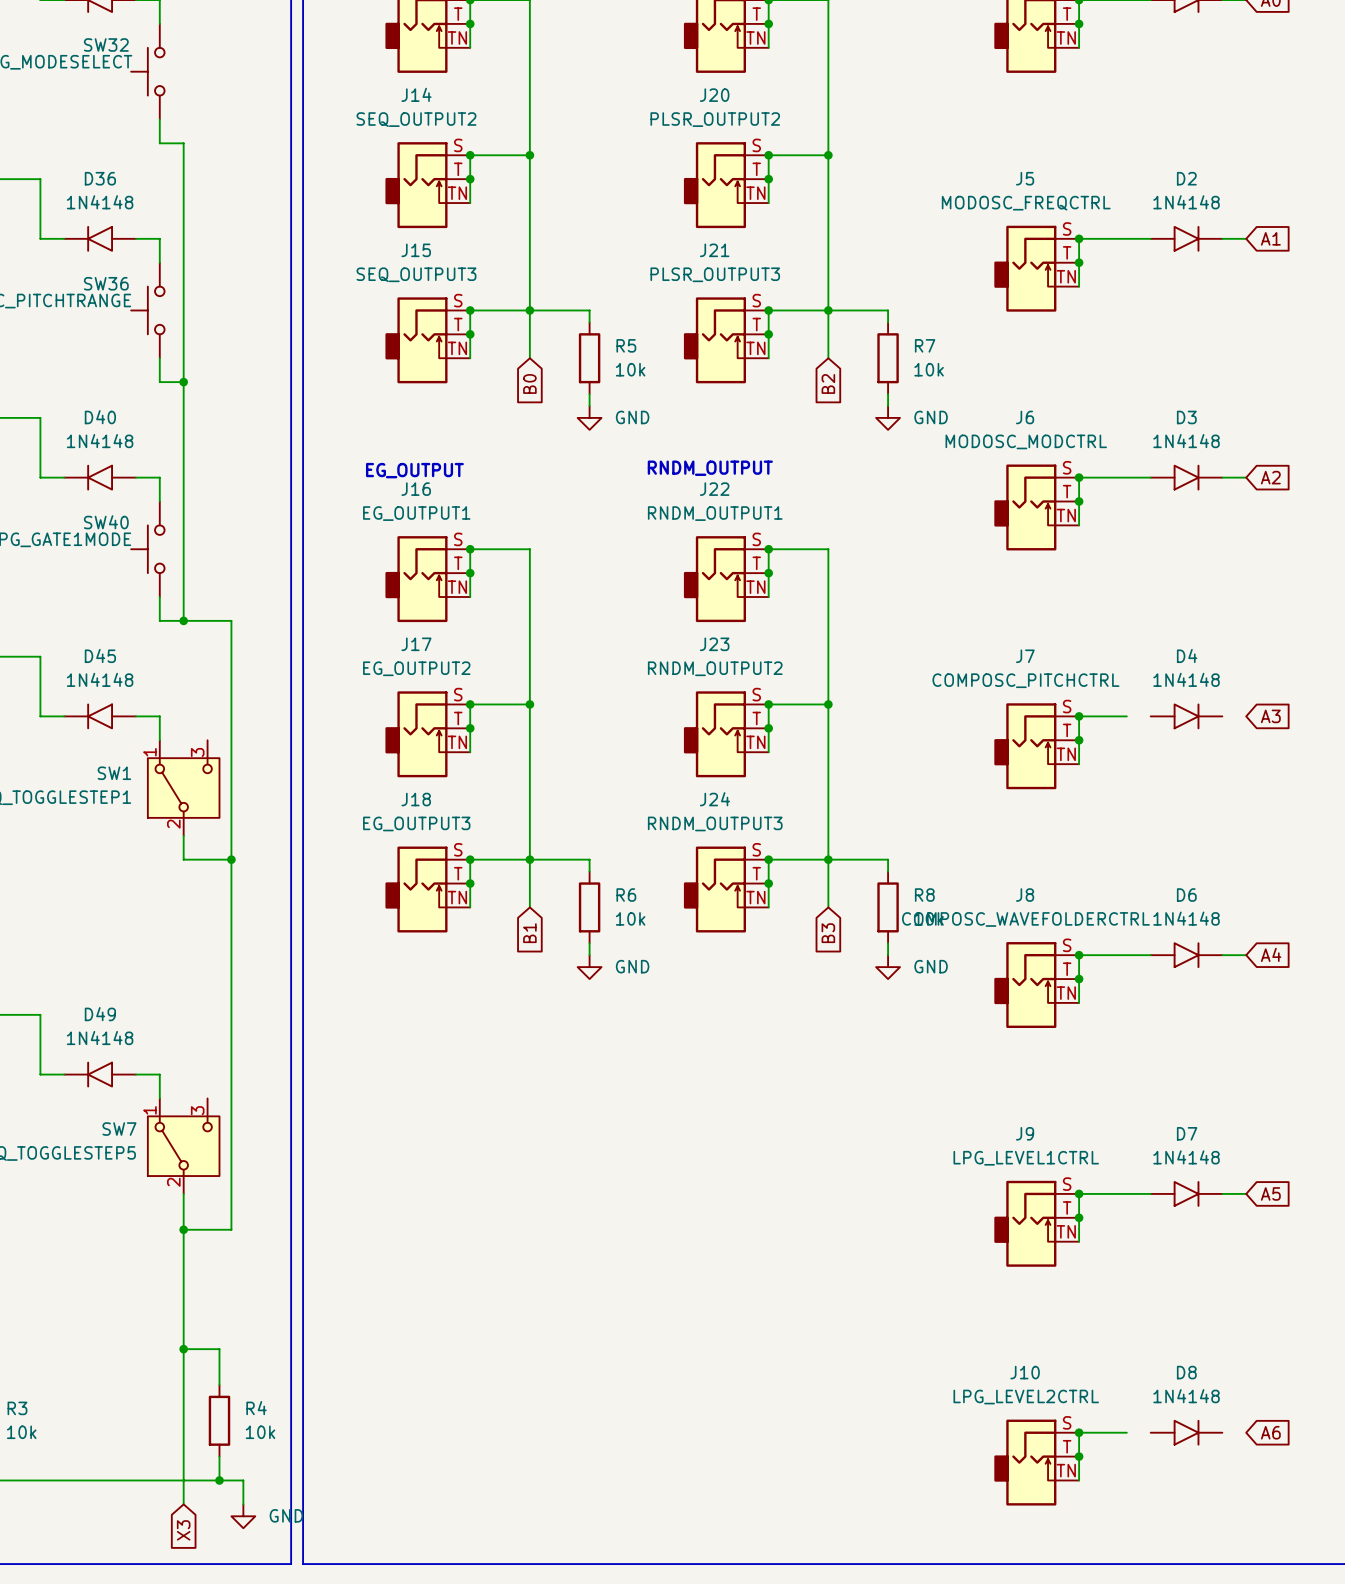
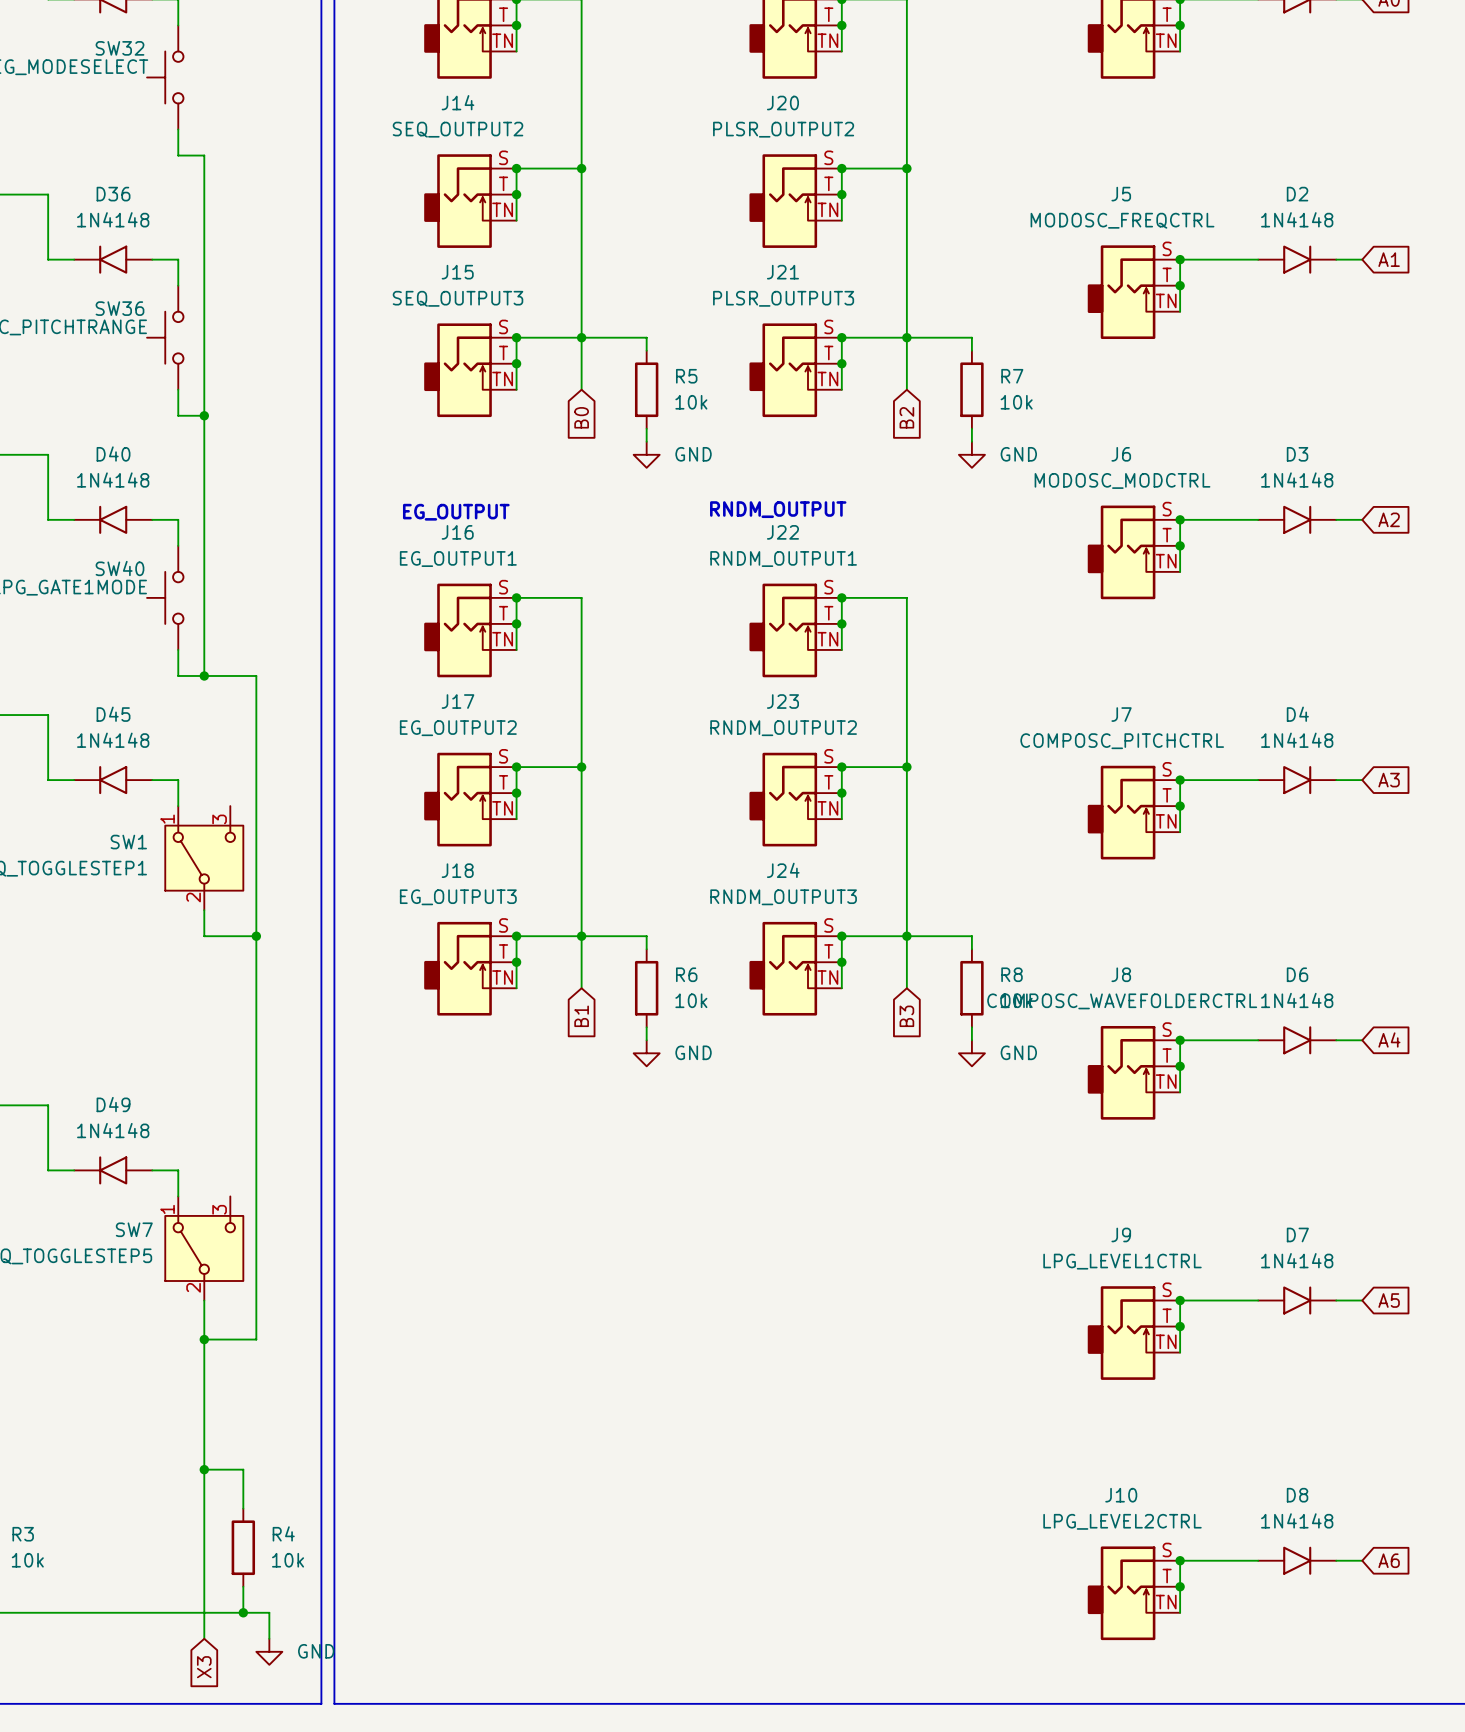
wire: none -> (1232, 780) (1258, 780)
wire: none -> (1336, 780) (1362, 780)
wire: none -> (1232, 1560) (1258, 1560)
wire: none -> (1336, 1560) (1362, 1560)

